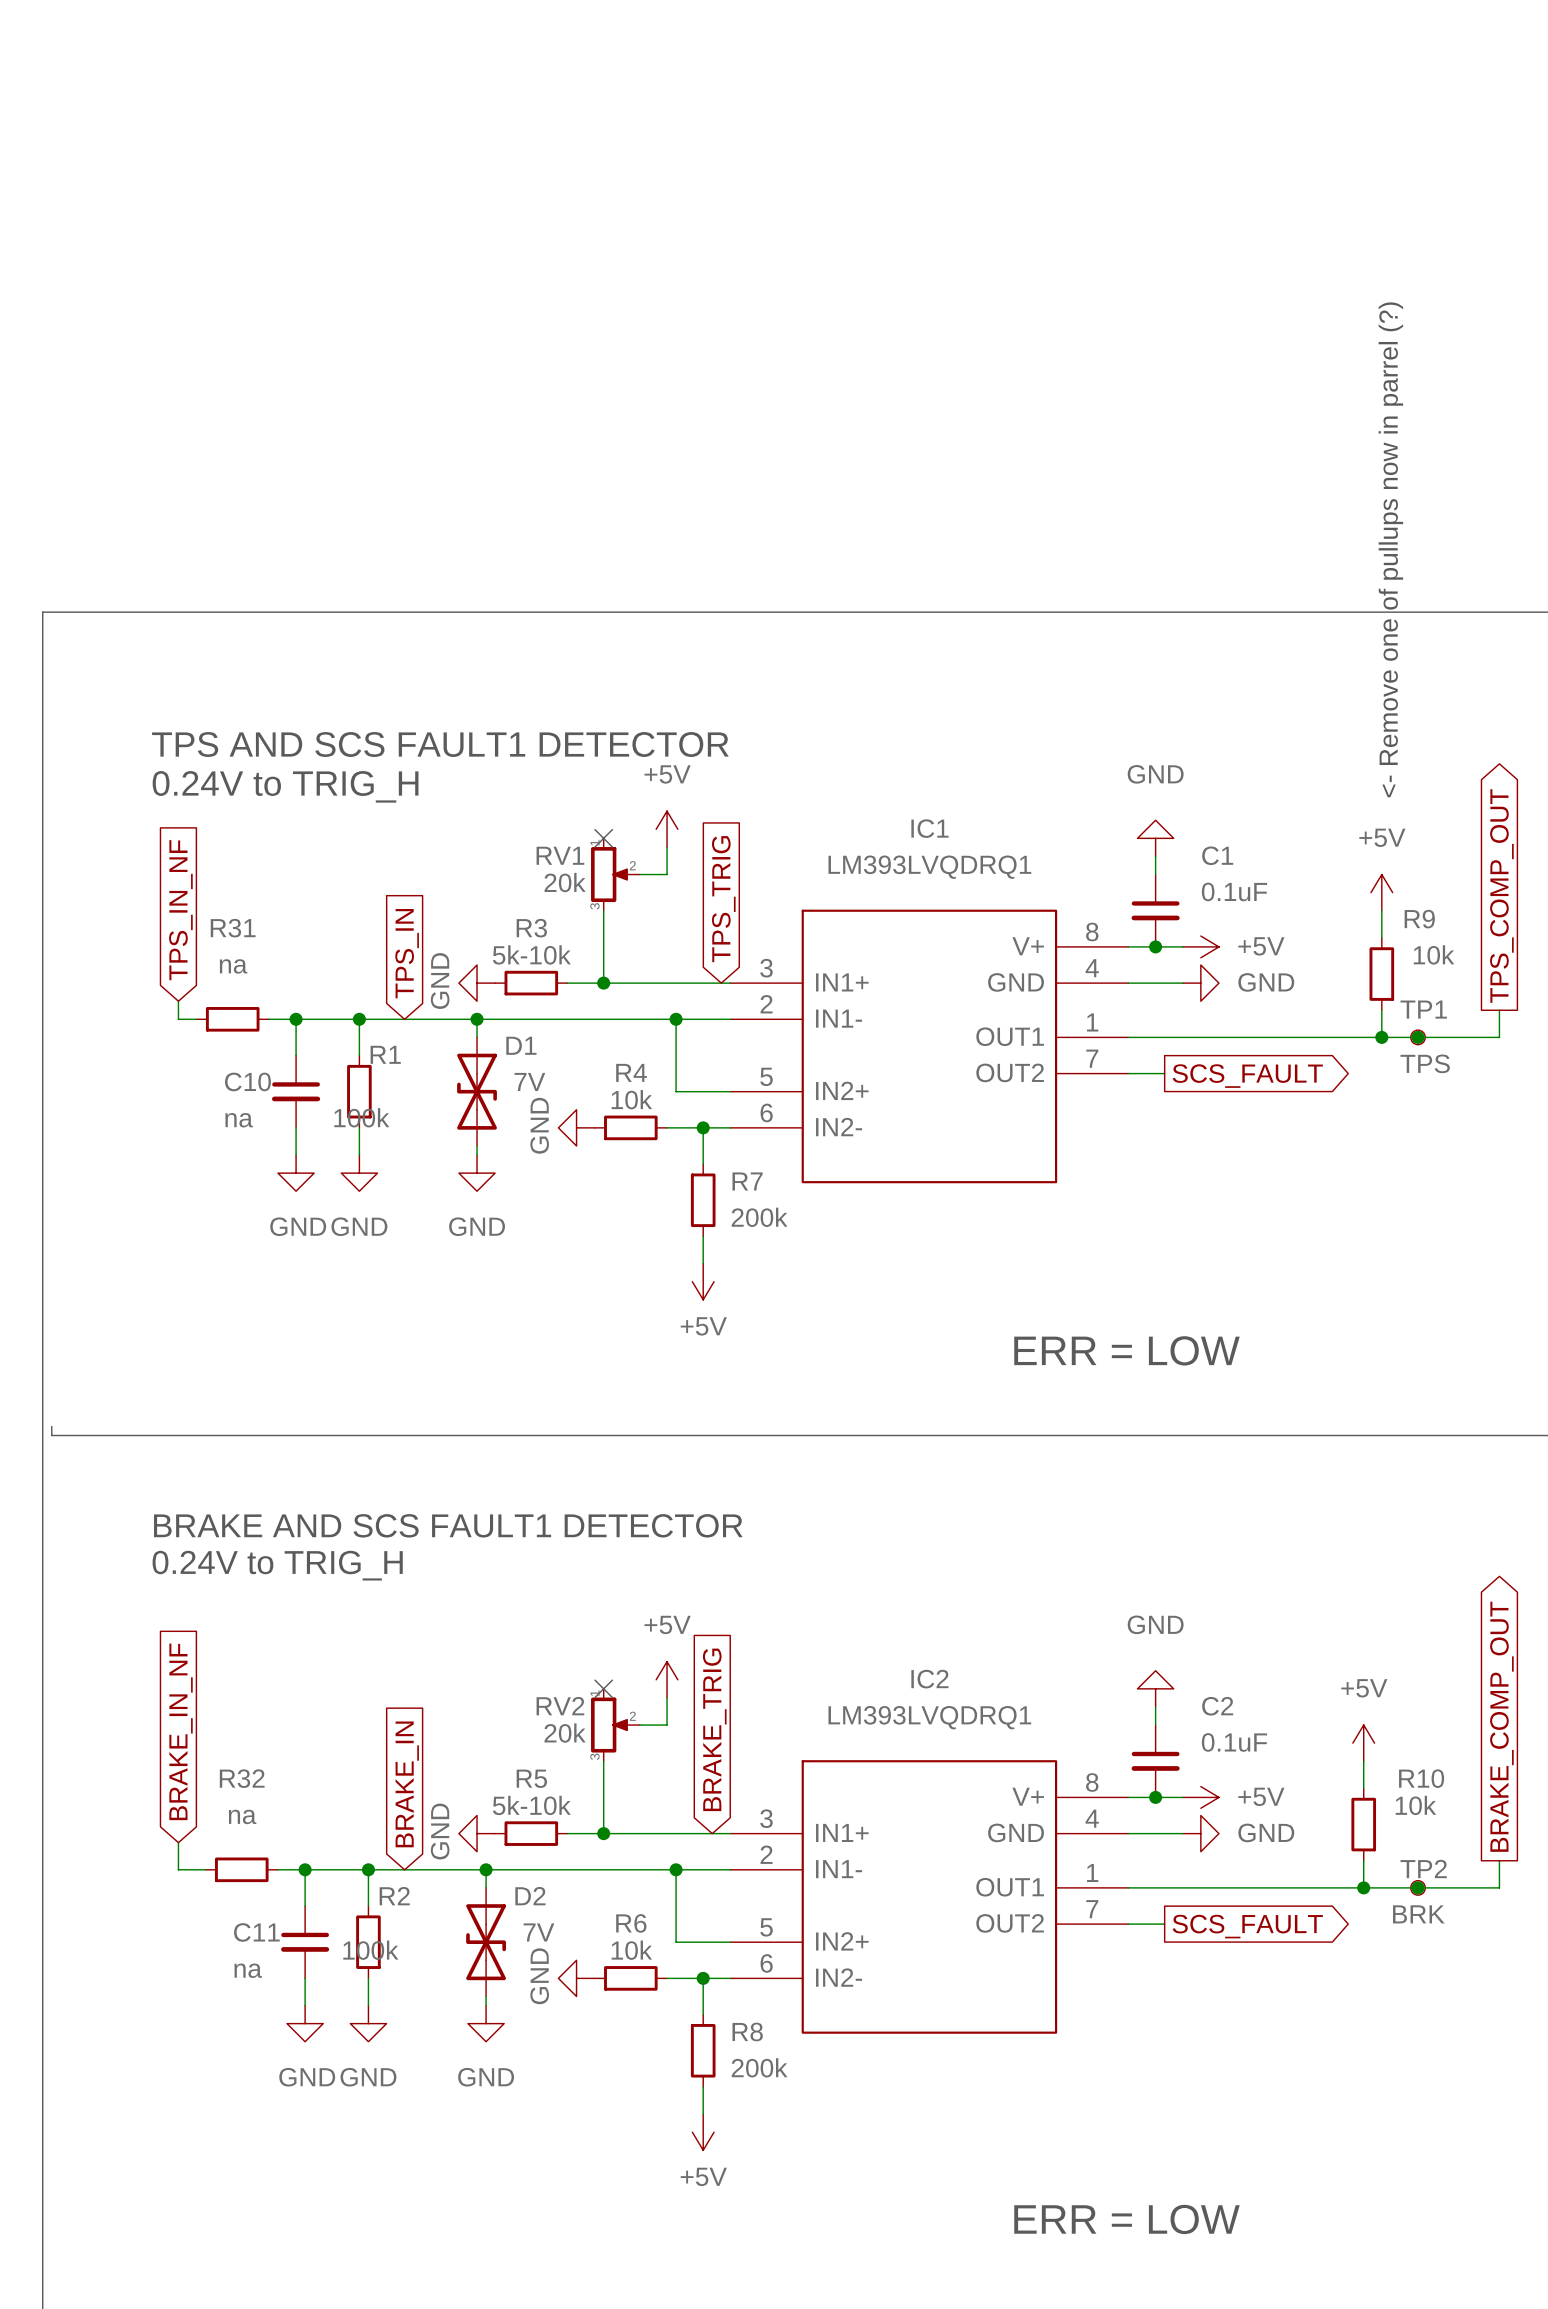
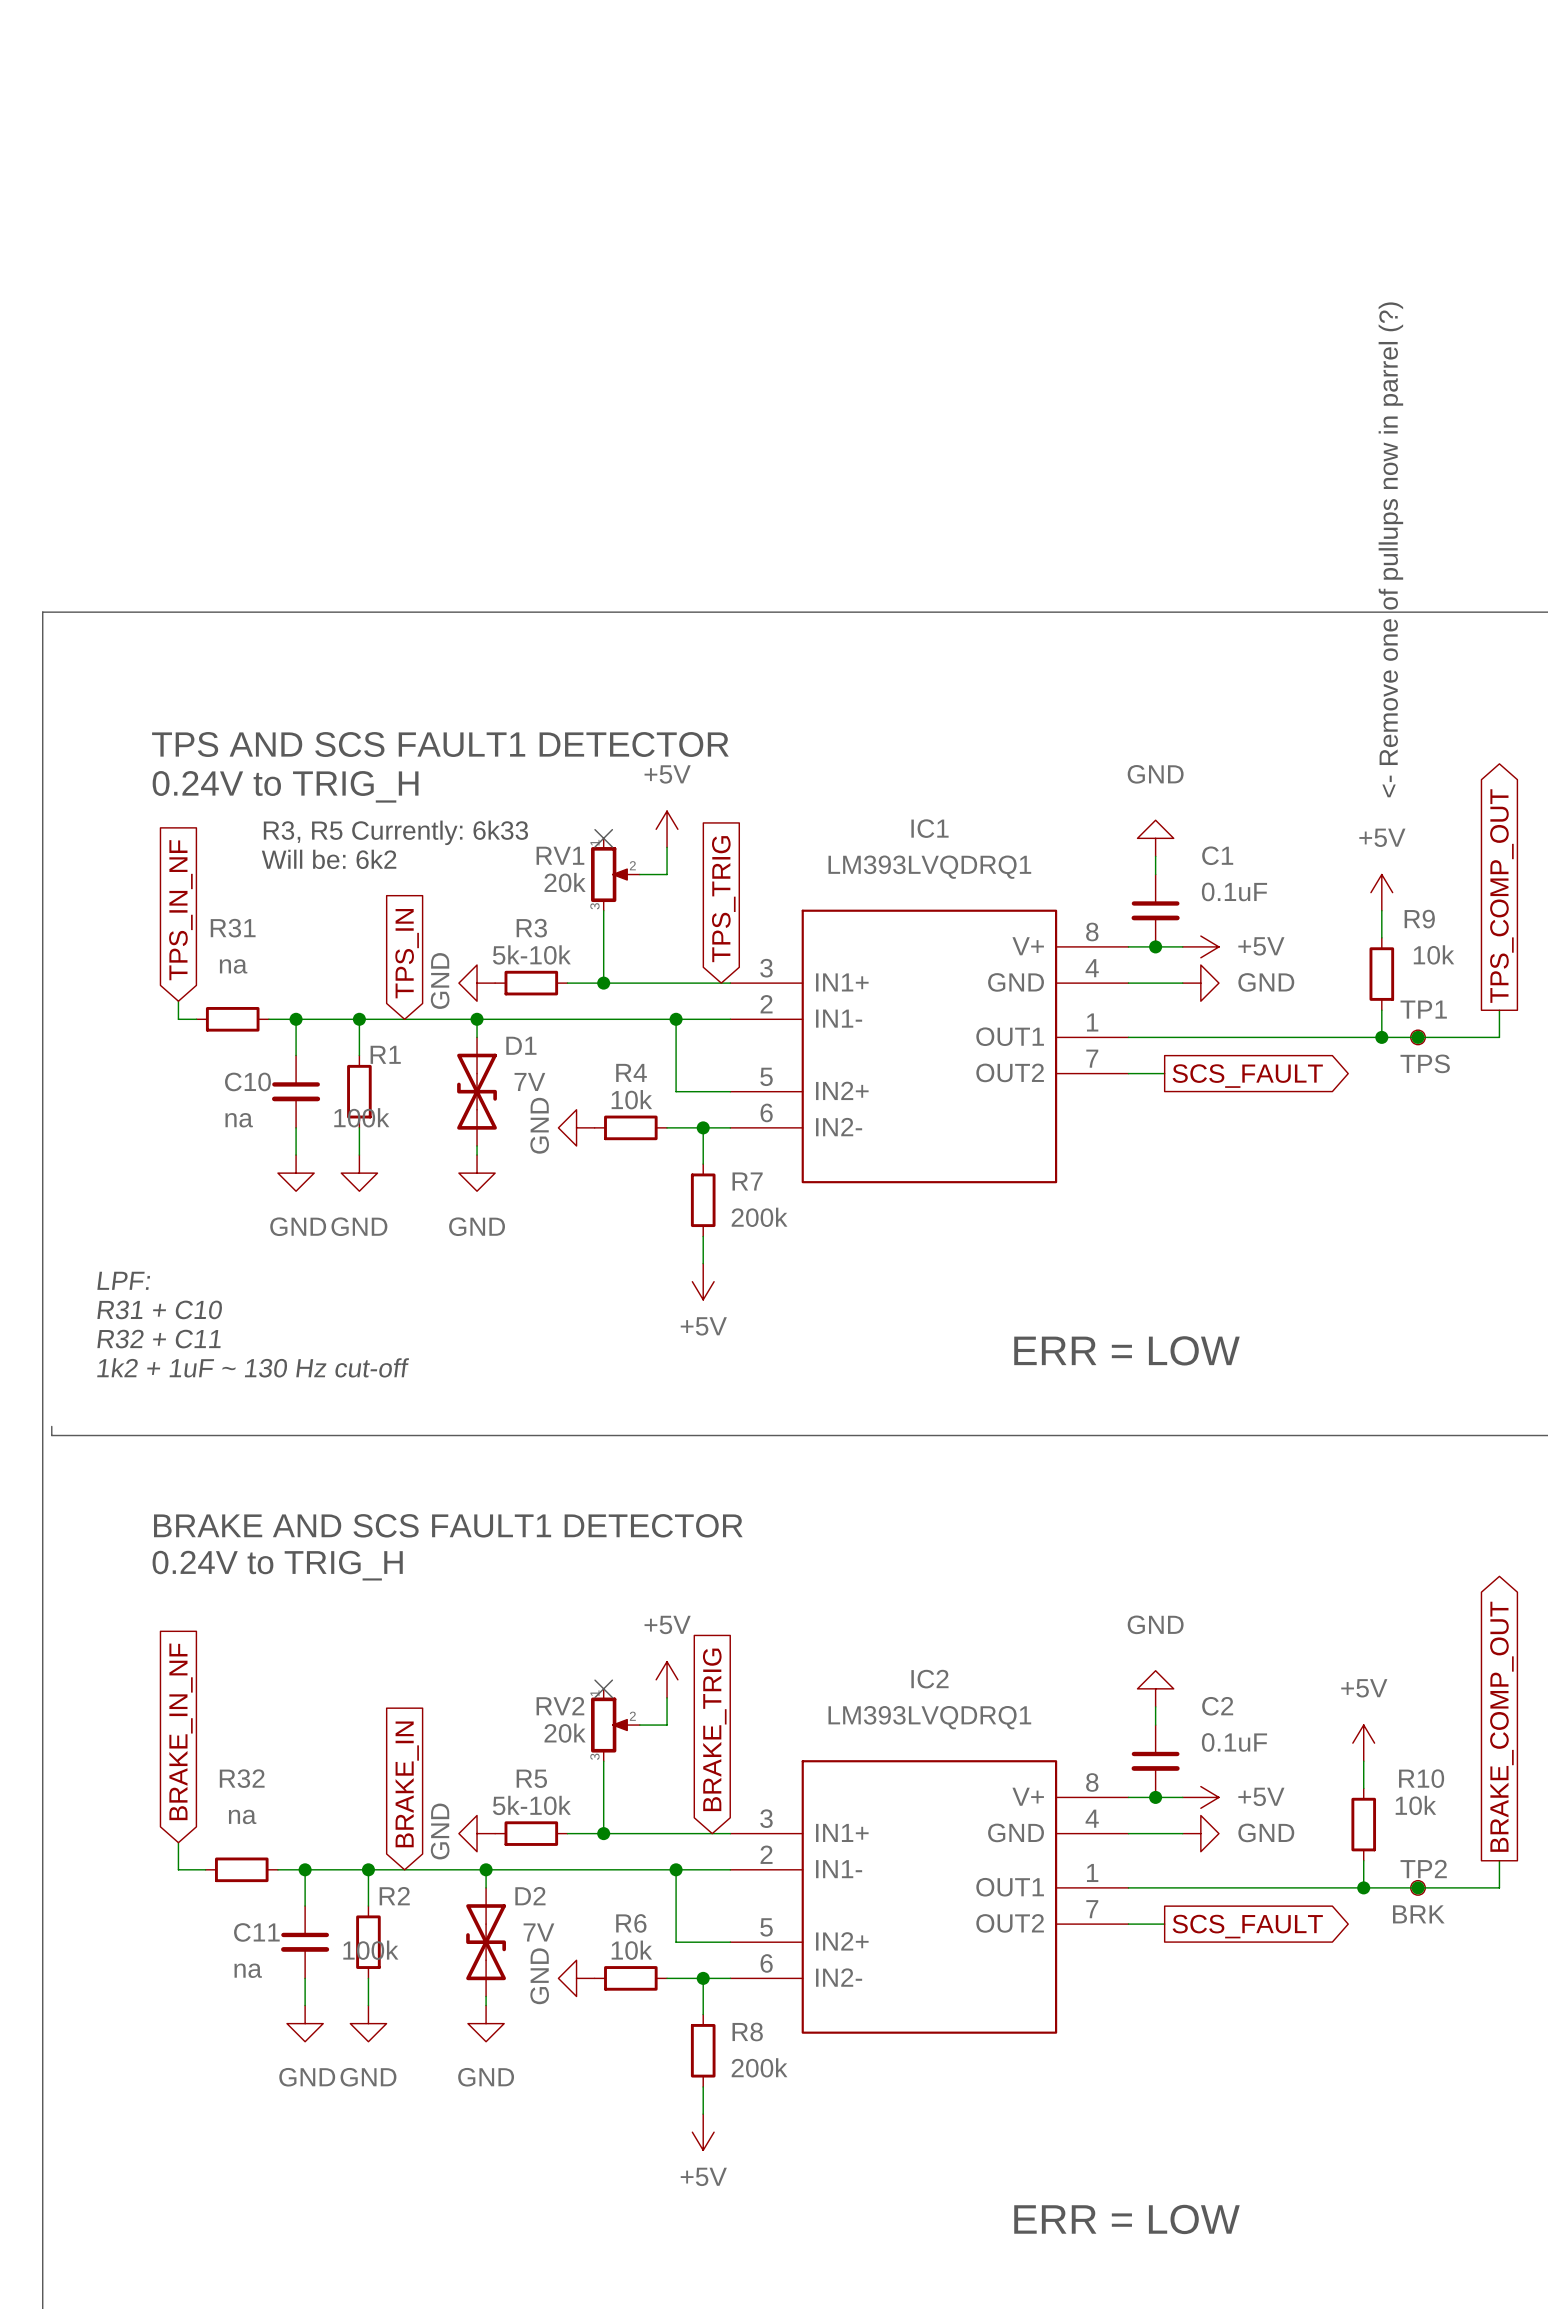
text: none -> R3, R5 Currently: 6k33 (395, 832)
text: none -> Will be: 6k2 (329, 859)
text: none -> LPF: (123, 1280)
text: none -> R31 + C10 (159, 1309)
text: none -> R32 + C11 (158, 1339)
text: none -> 1k2 + 1uF ~ 130 Hz cut-off (253, 1367)

